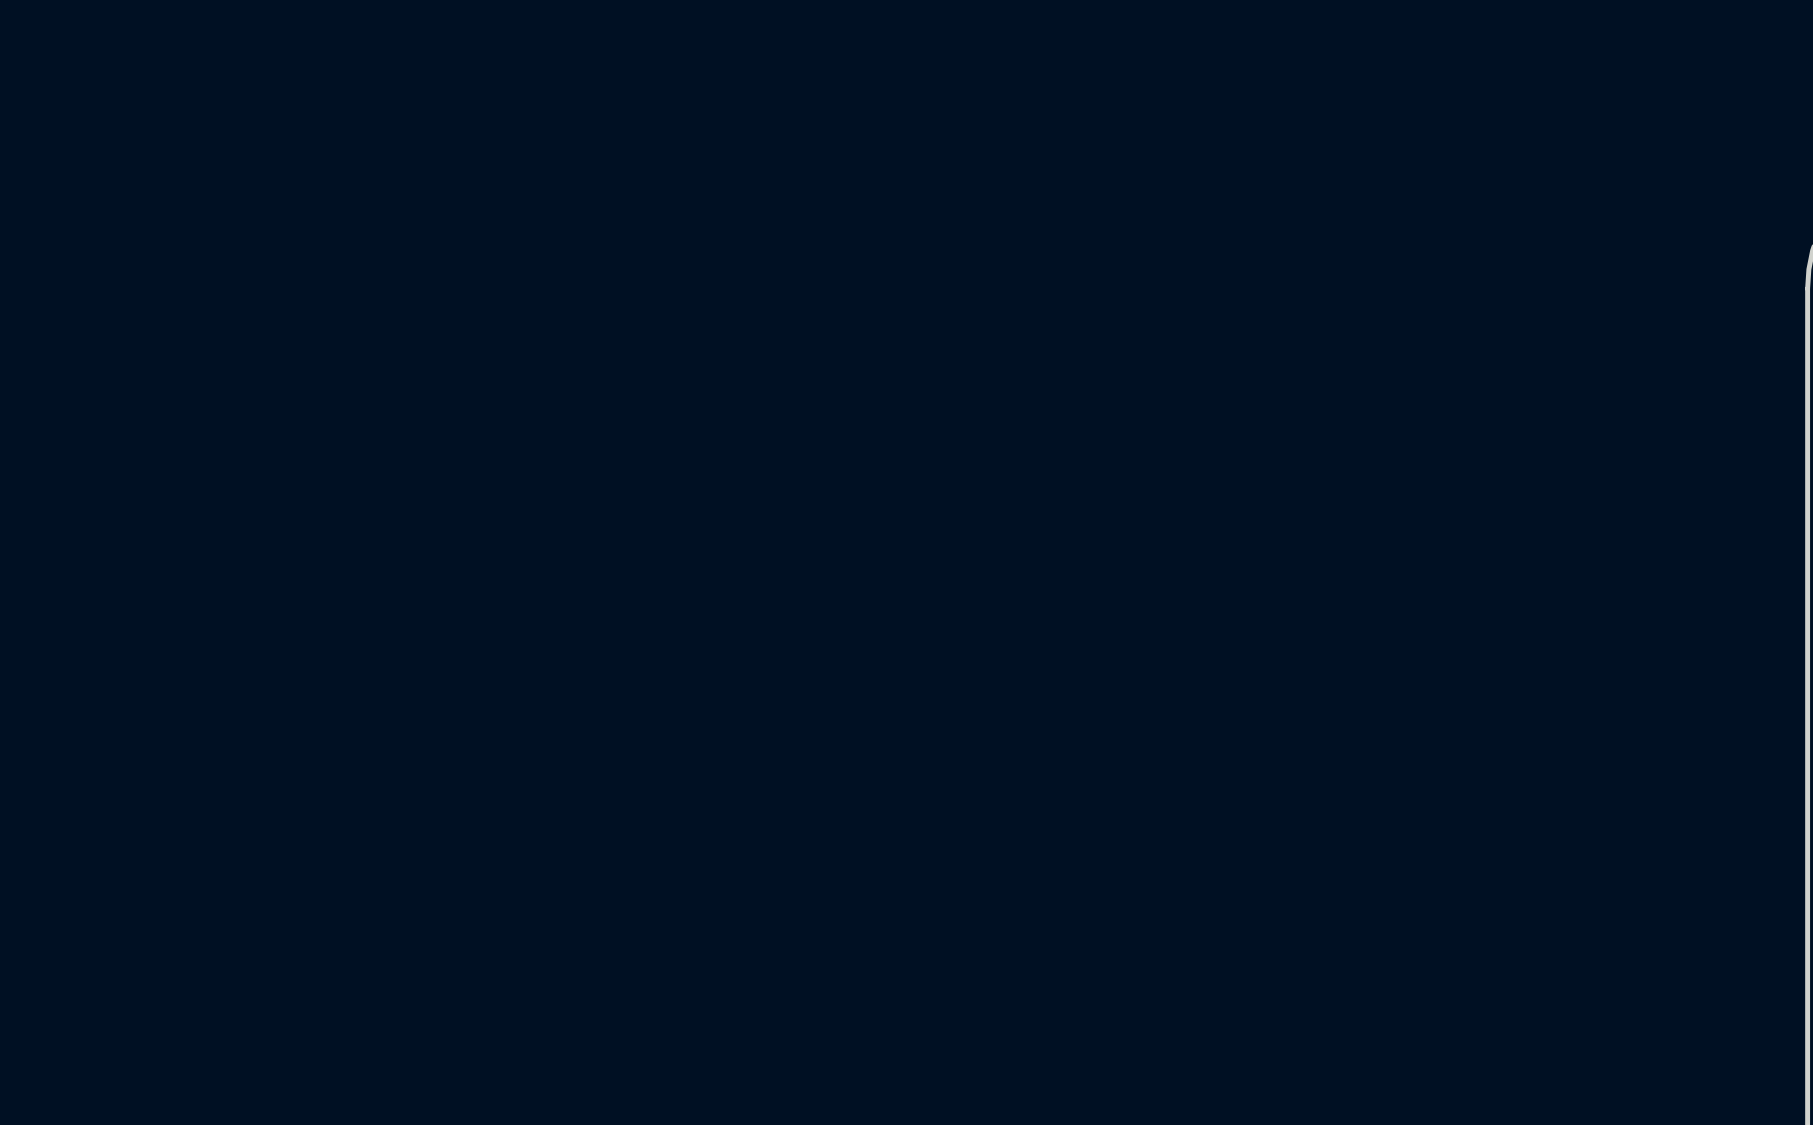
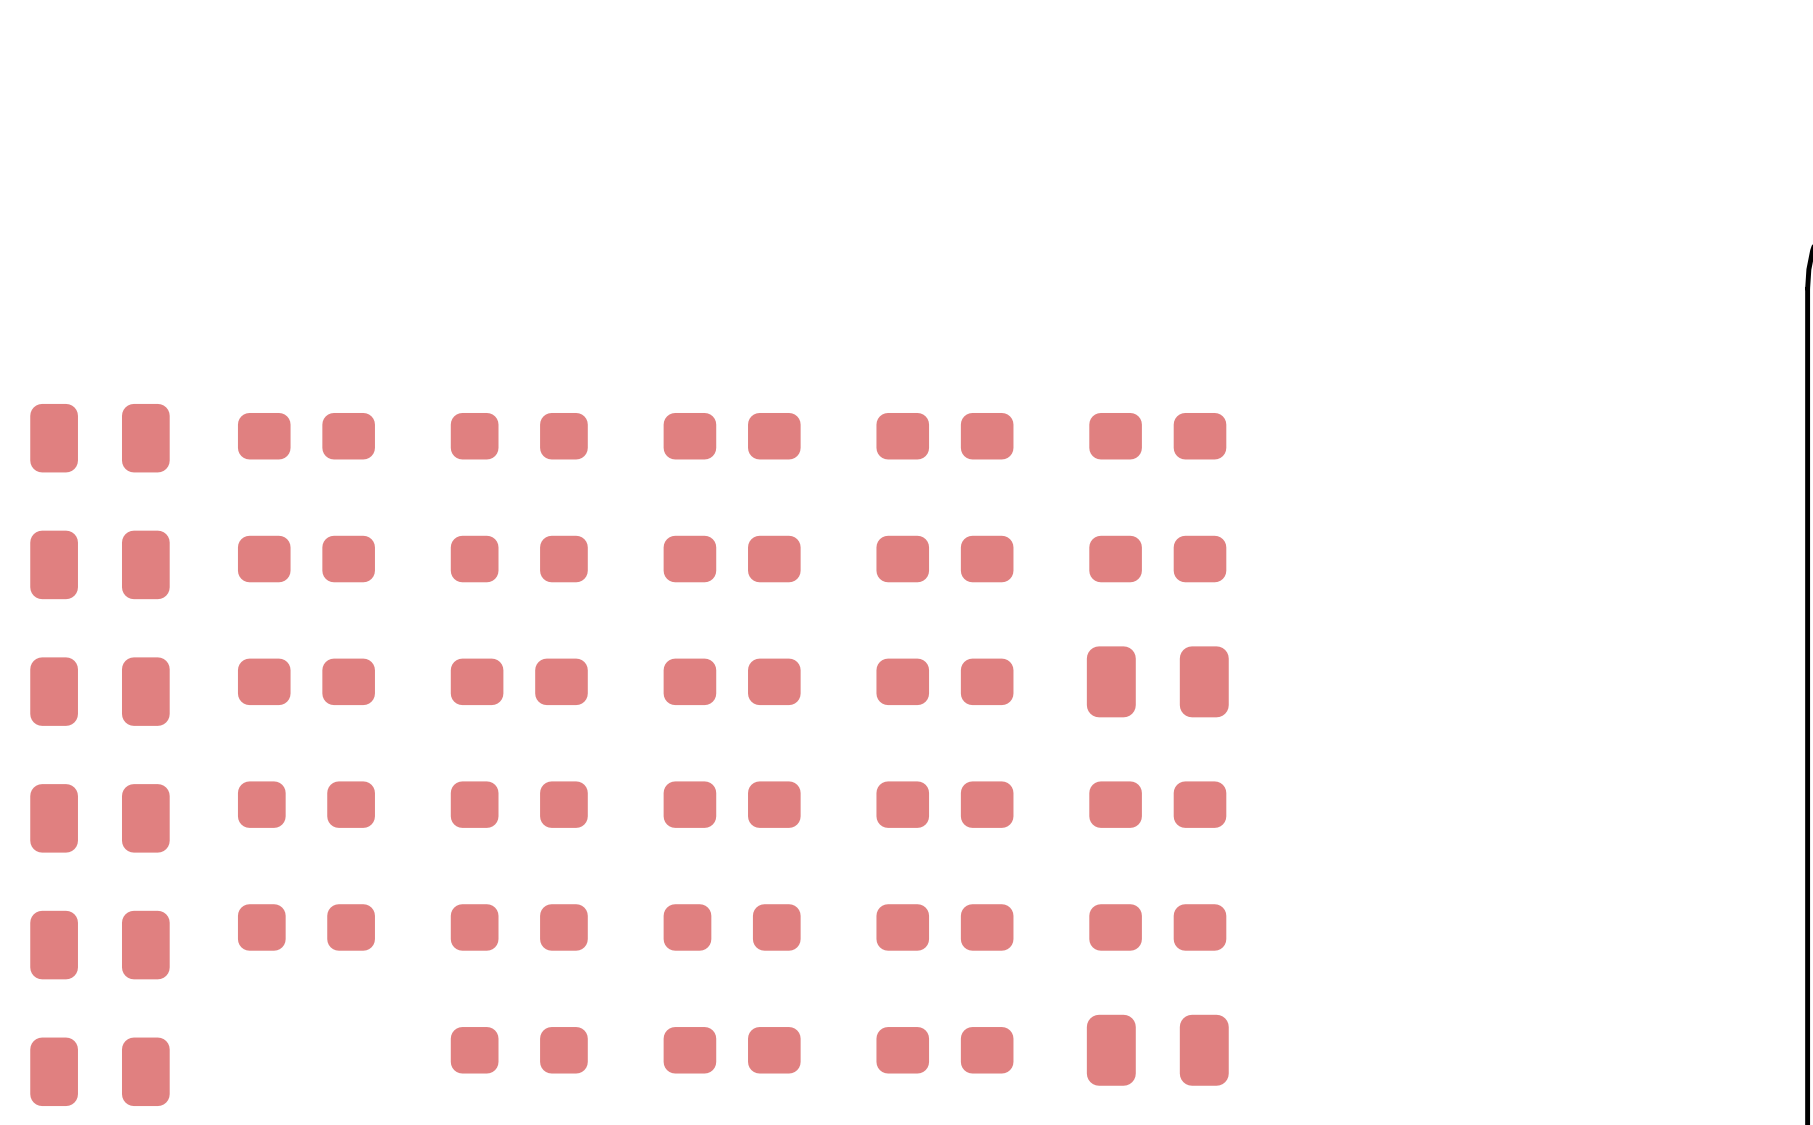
part: none -> (306, 436)
part: none -> (519, 436)
part: none -> (732, 436)
part: none -> (944, 436)
part: none -> (1157, 436)
part: none -> (99, 438)
part: none -> (306, 559)
part: none -> (519, 559)
part: none -> (732, 559)
part: none -> (944, 559)
part: none -> (1157, 559)
part: none -> (99, 564)
part: none -> (306, 681)
part: none -> (519, 681)
part: none -> (732, 681)
part: none -> (944, 681)
part: none -> (1157, 681)
part: none -> (99, 691)
part: none -> (306, 804)
part: none -> (519, 804)
part: none -> (732, 804)
part: none -> (944, 804)
part: none -> (1157, 804)
part: none -> (99, 818)
part: none -> (306, 927)
part: none -> (519, 927)
part: none -> (732, 927)
part: none -> (944, 927)
part: none -> (1157, 927)
part: none -> (99, 945)
part: none -> (519, 1050)
part: none -> (732, 1050)
part: none -> (944, 1050)
part: none -> (1157, 1050)
part: none -> (99, 1071)

